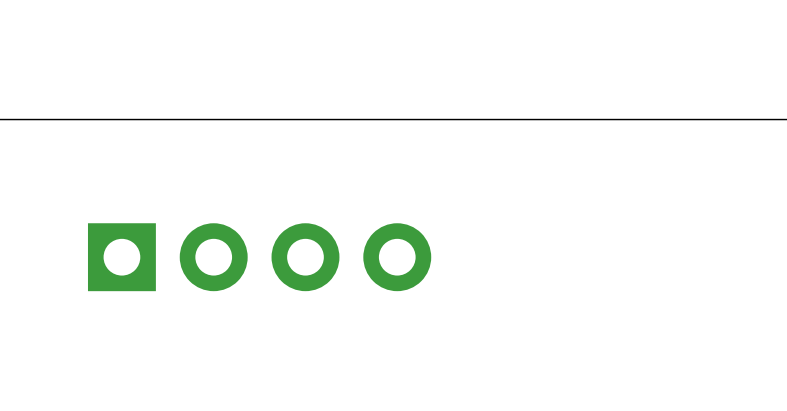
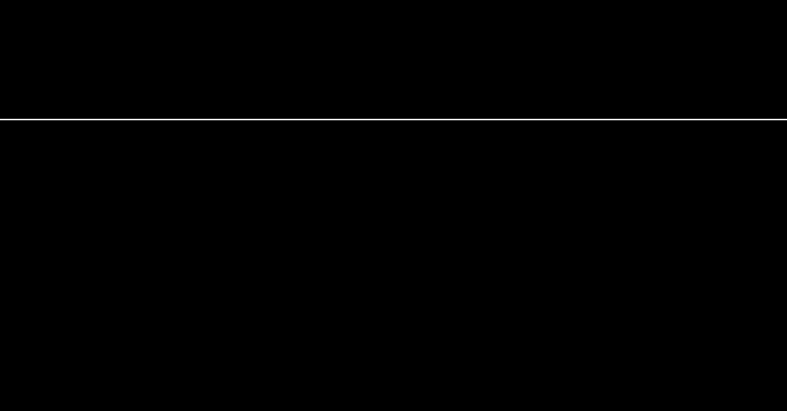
part: (259, 257) -> none

